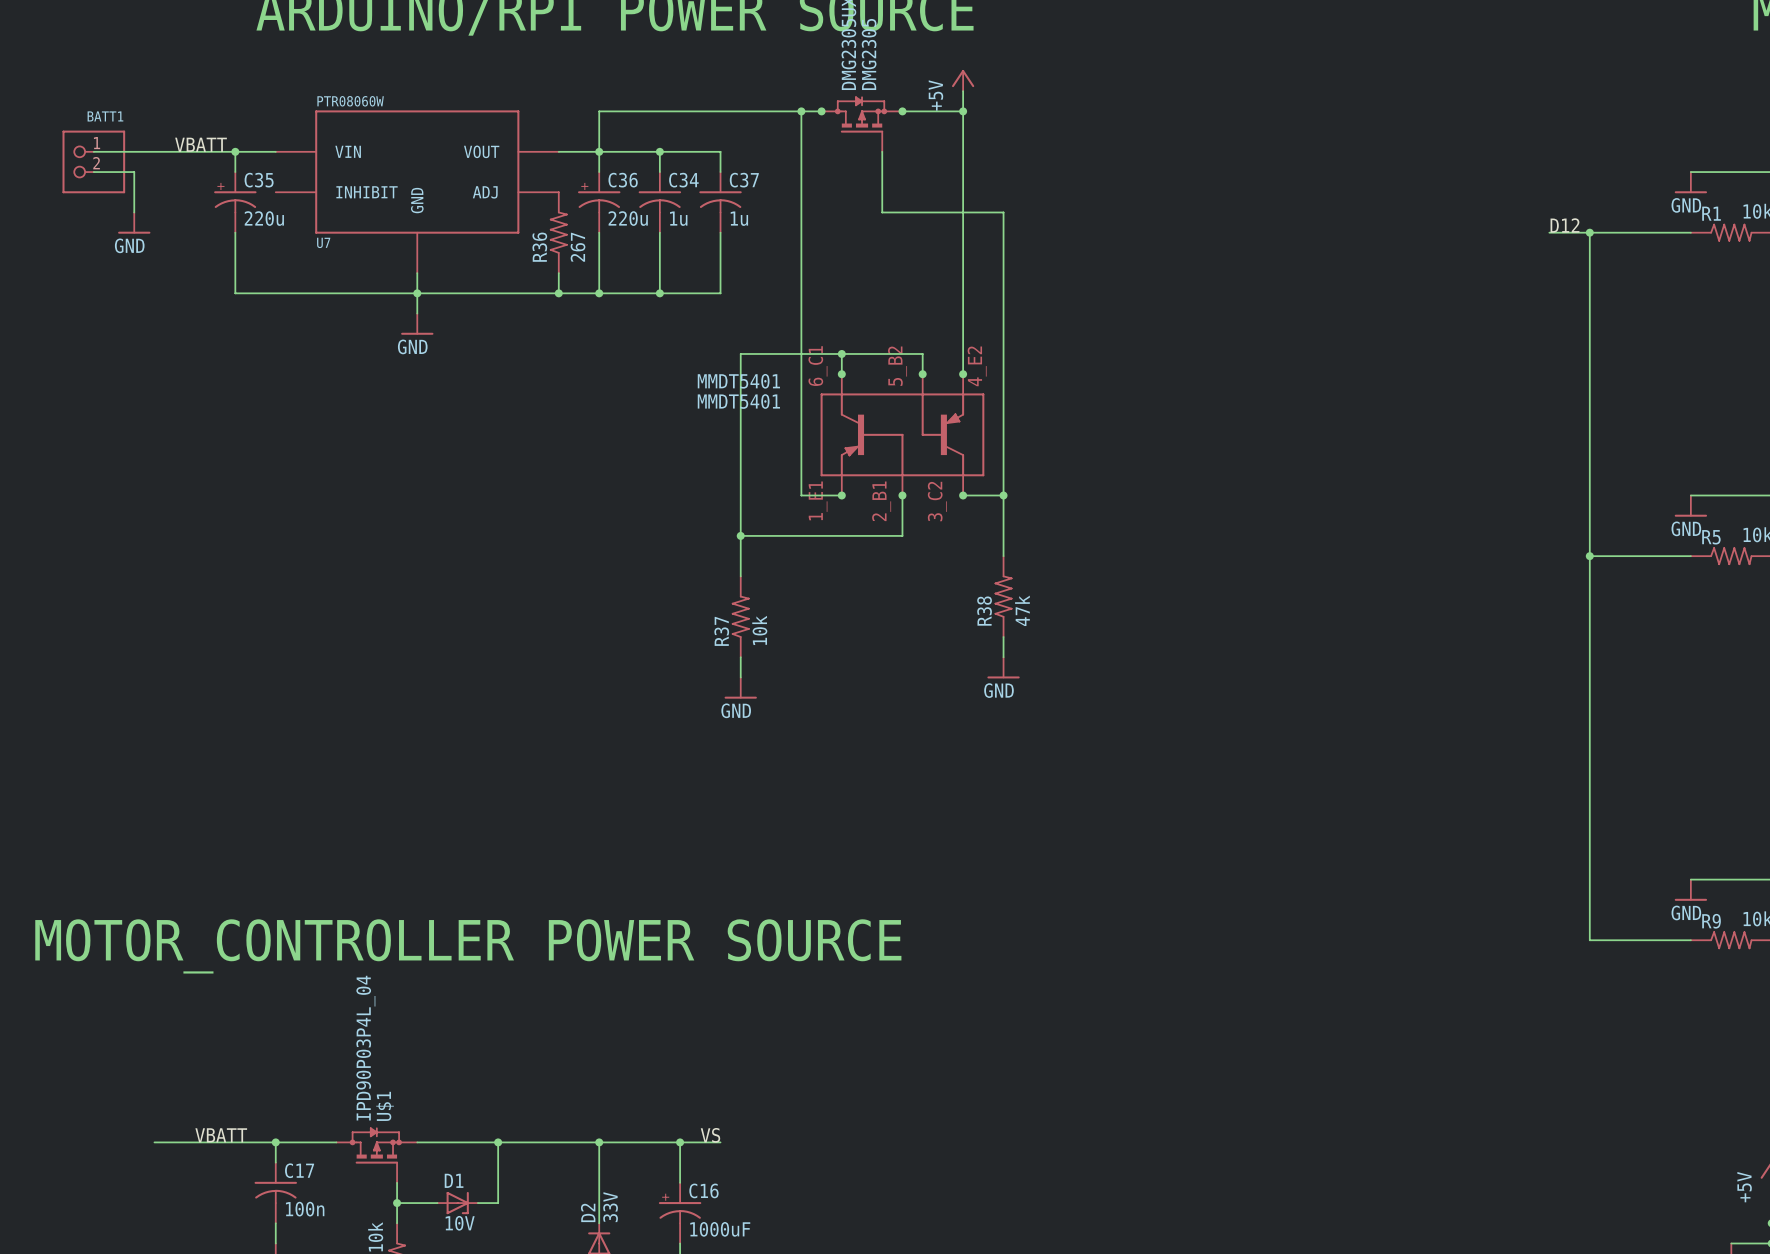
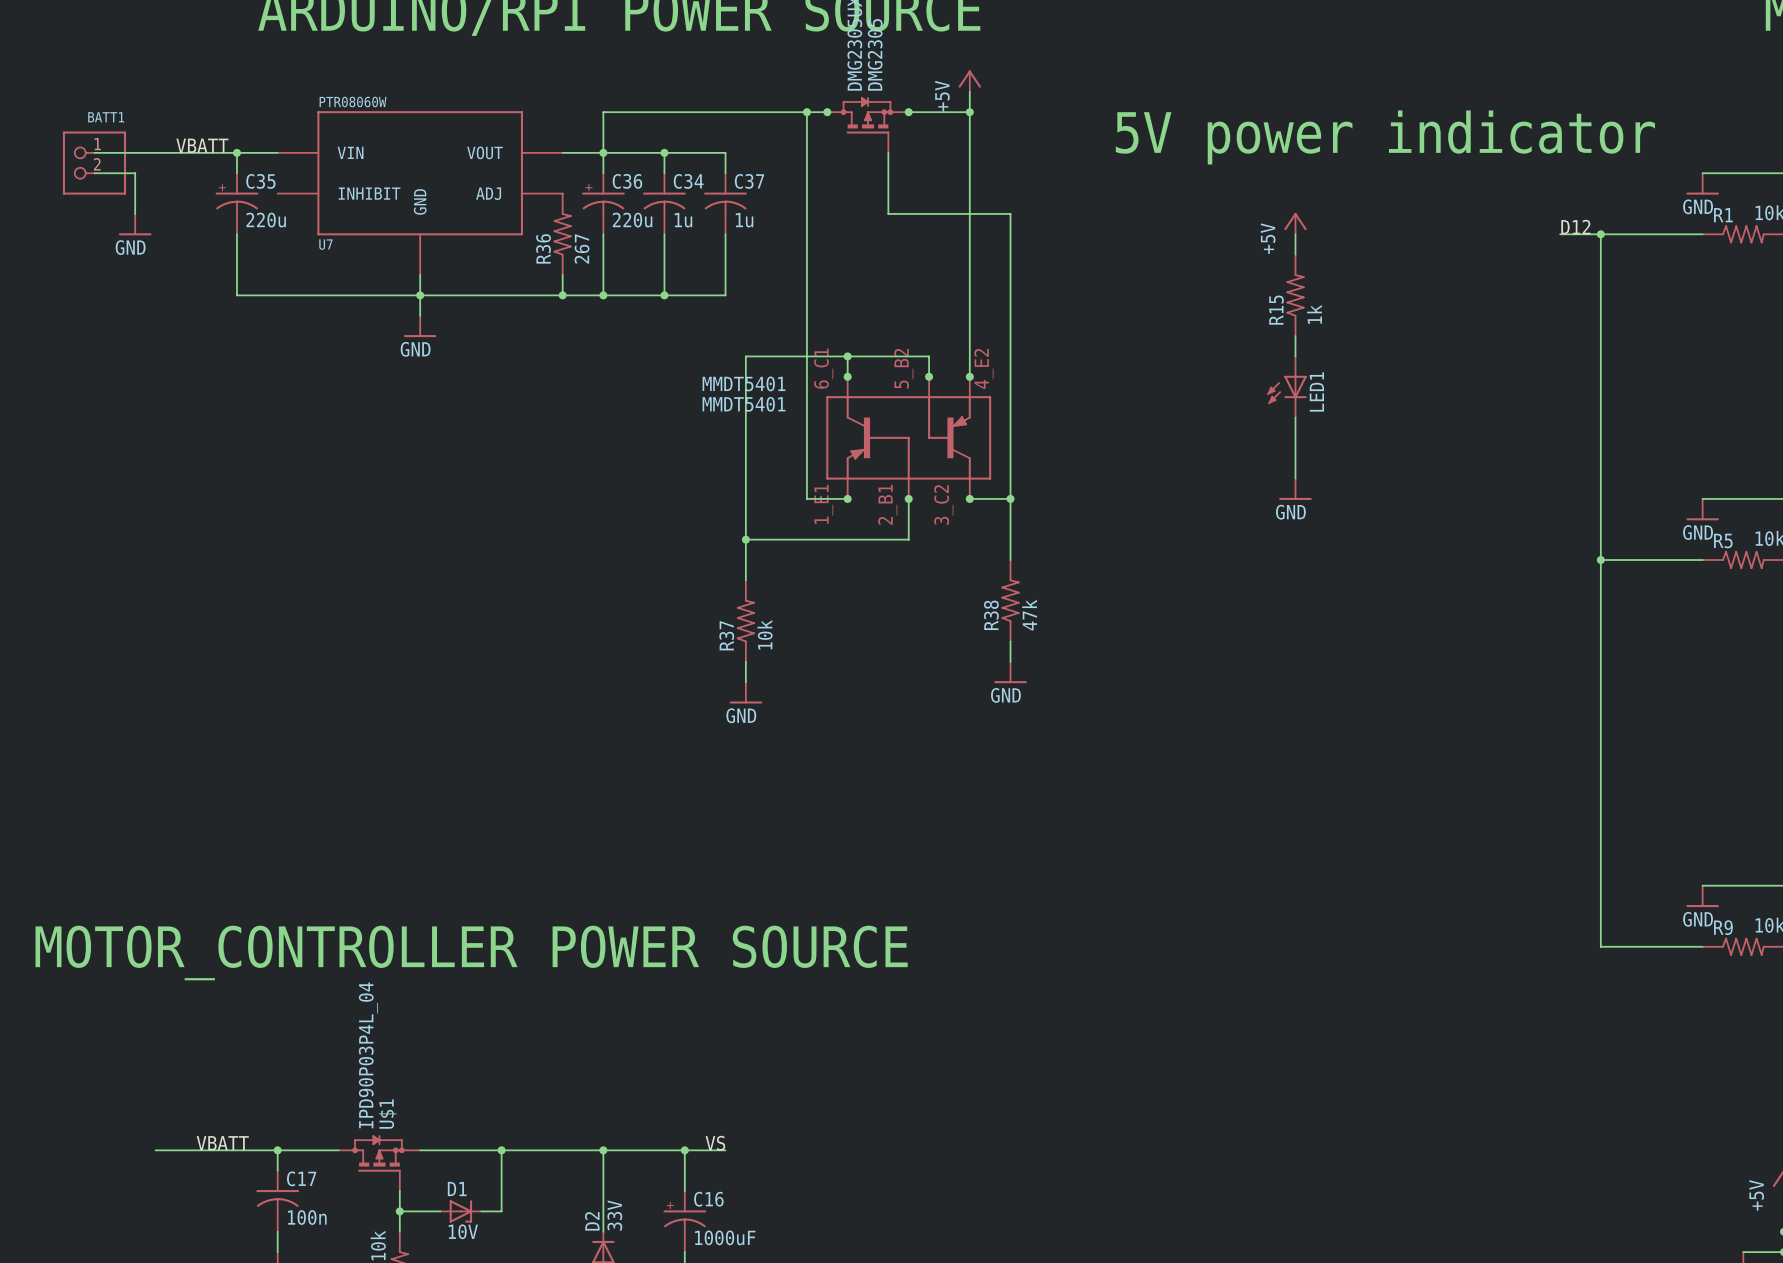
text: none -> 5V power indicator (1385, 137)
power symbol: none -> +5V (1295, 223)
wire: none -> (1295, 234) (1295, 254)
R15: none -> 1k (1295, 295)
wire: none -> (1295, 336) (1295, 356)
LED1: none -> (1287, 386)
wire: none -> (1295, 417) (1295, 478)
power symbol: none -> GND (1295, 489)

